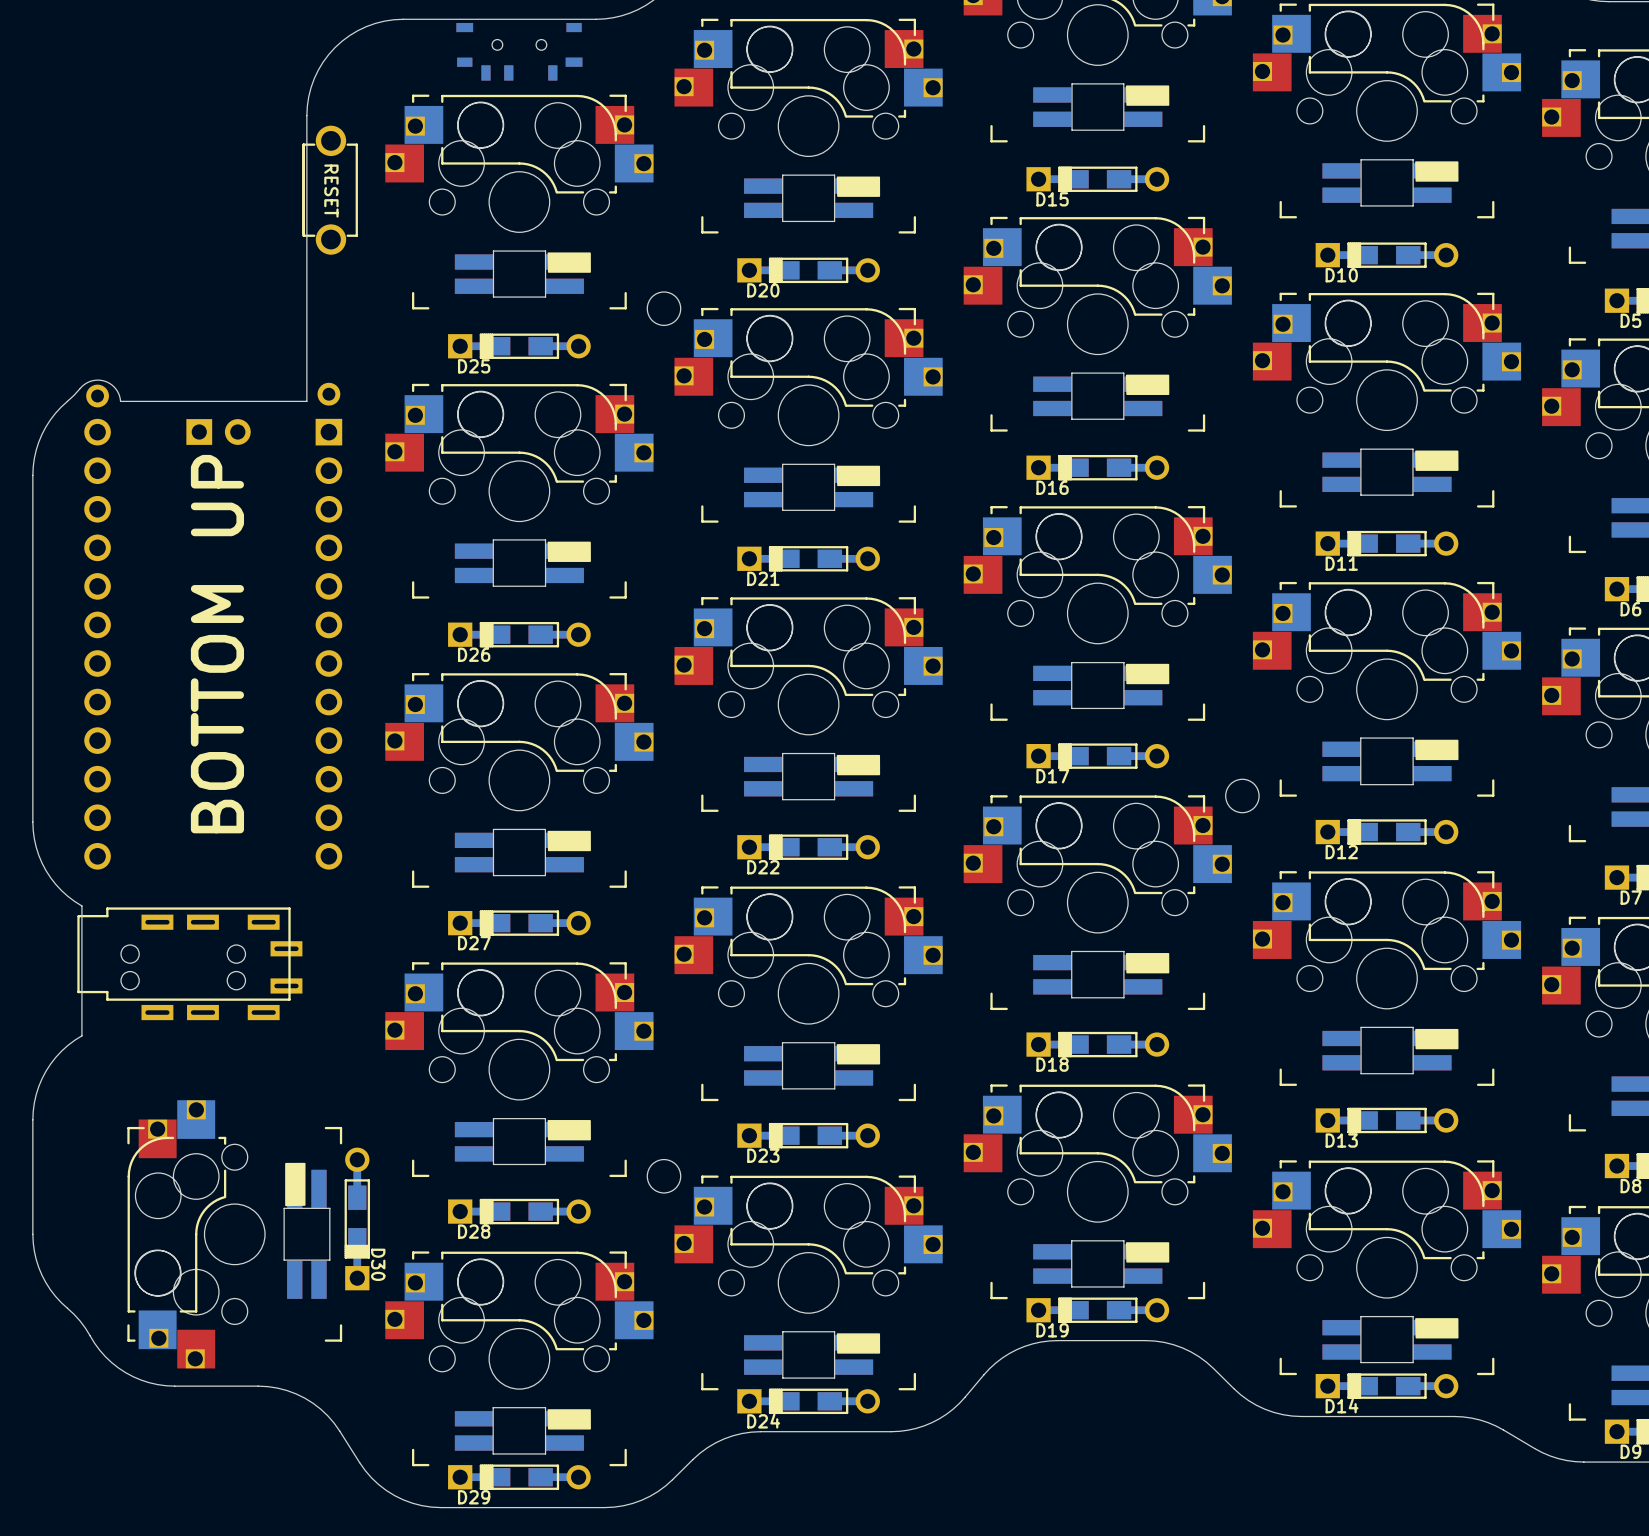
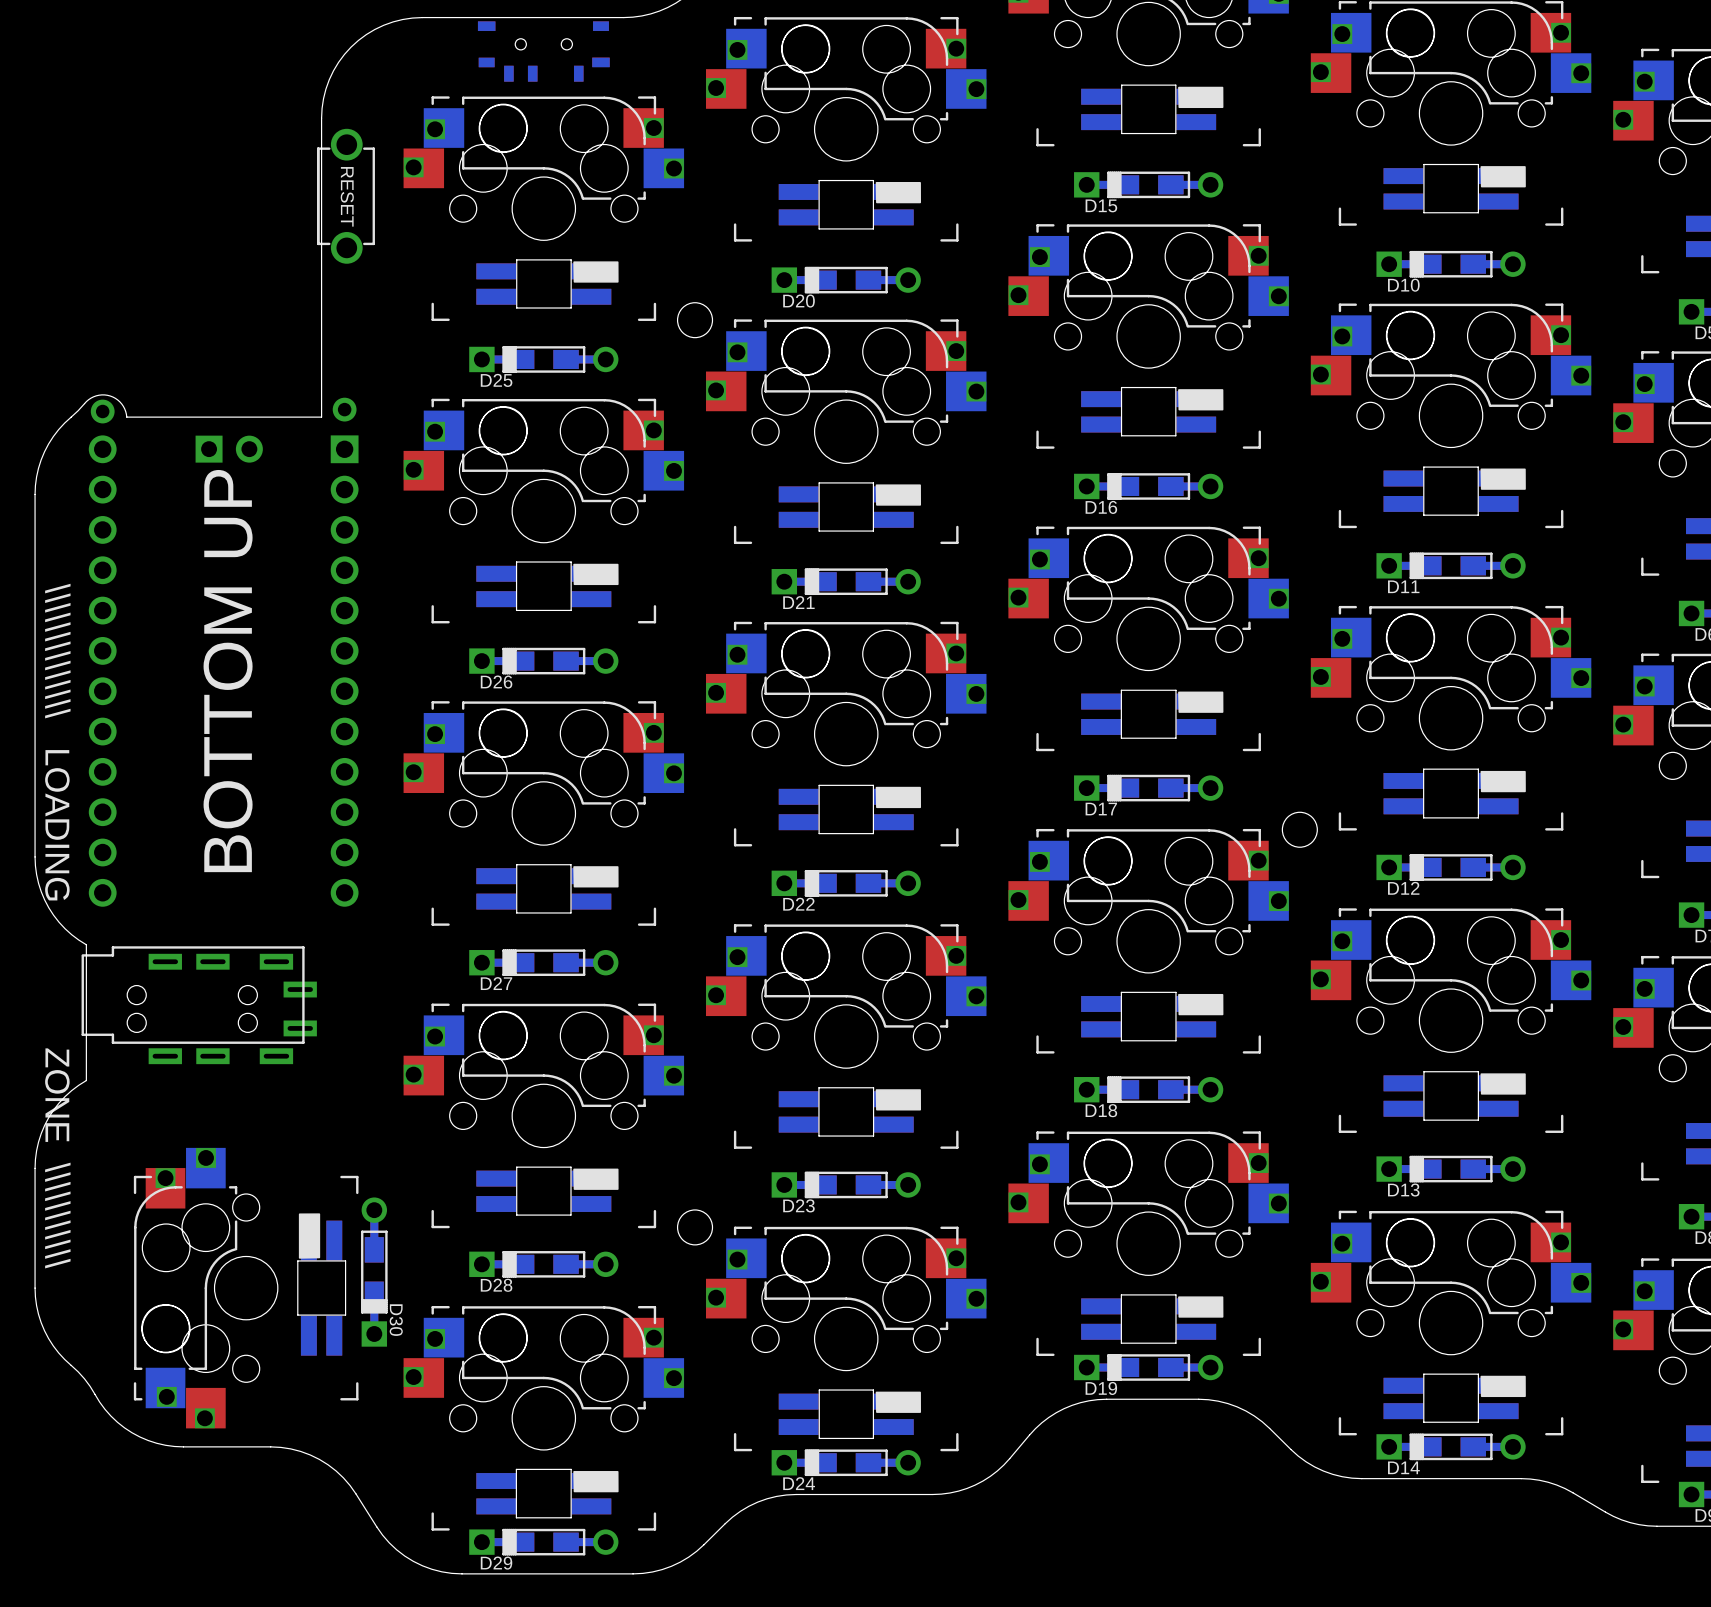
text: none -> \\\\\\\\\\\\\\ LOADING ZONE \\\\\\\\\\\ (57, 926)

